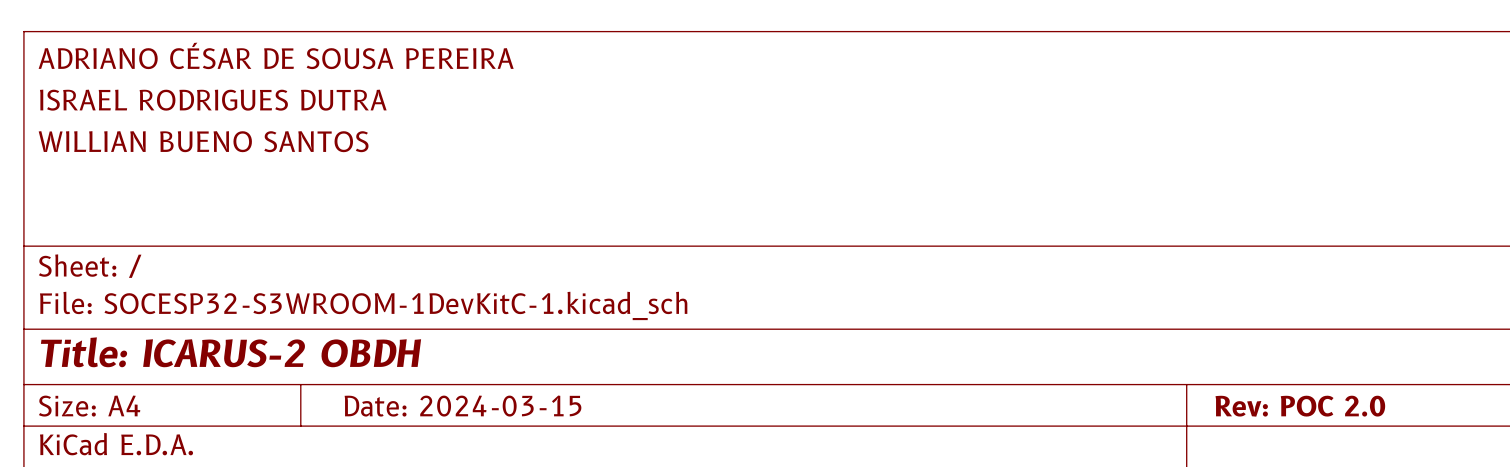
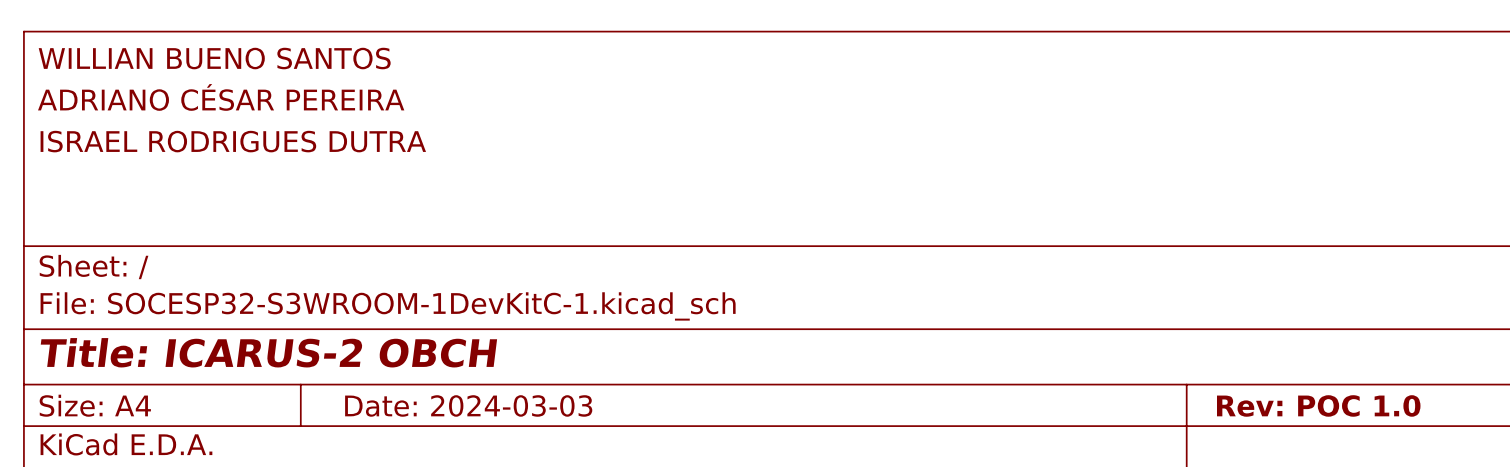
title block: ADRIANO CÉSAR DE SOUSA PEREIRA (276, 55) -> WILLIAN BUENO SANTOS (214, 58)
title block: ISRAEL RODRIGUES DUTRA (213, 100) -> ADRIANO CÉSAR PEREIRA (221, 97)
title block: WILLIAN BUENO SANTOS (203, 141) -> ISRAEL RODRIGUES DUTRA (233, 141)
title block: Title: ICARUS-2 OBDH (231, 352) -> Title: ICARUS-2 OBCH (268, 352)
title block: Date: 2024-03-15 (463, 406) -> Date: 2024-03-03 (468, 405)
title block: Rev: POC 2.0 (1300, 406) -> Rev: POC 1.0 (1318, 405)

